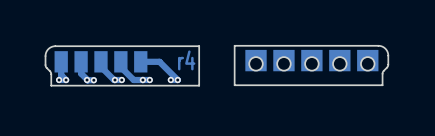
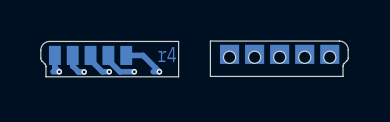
via: (59, 80) -> none
via: (87, 80) -> none
via: (114, 80) -> none
via: (142, 80) -> none
via: (170, 80) -> none

